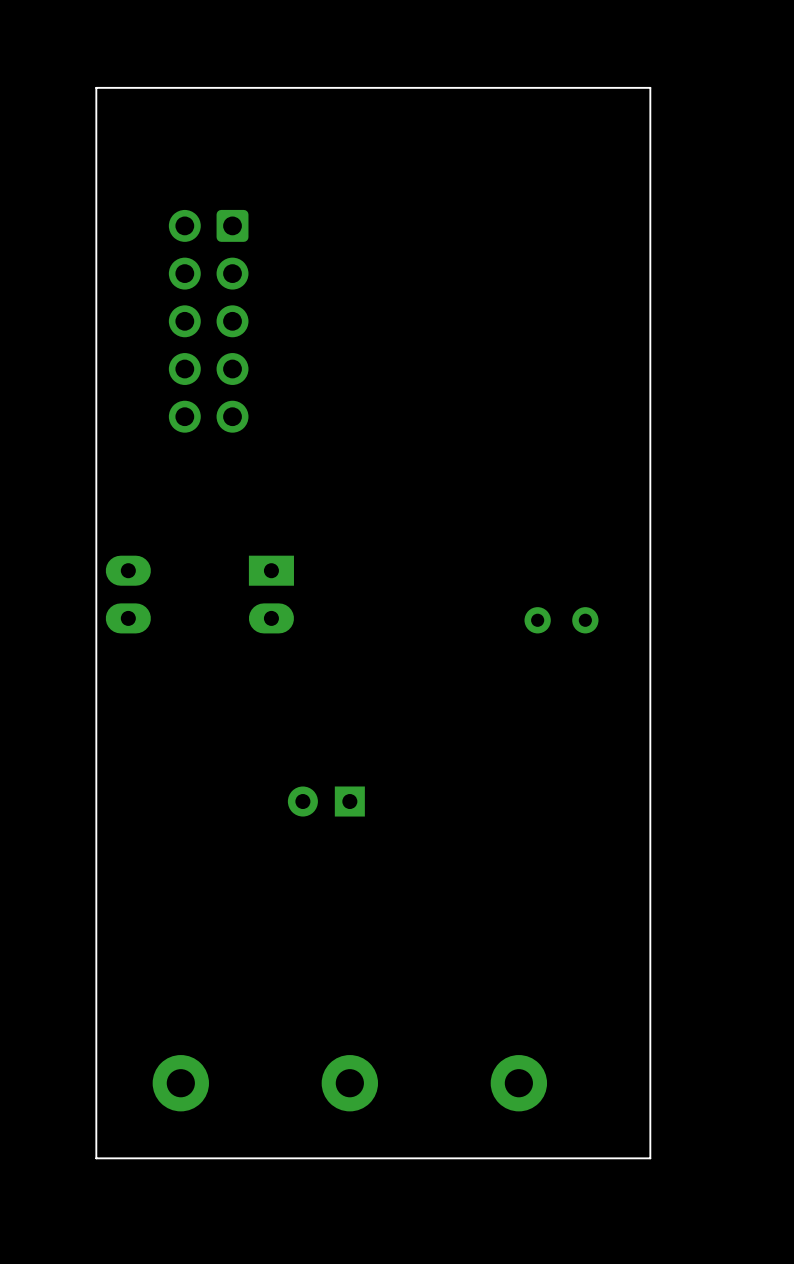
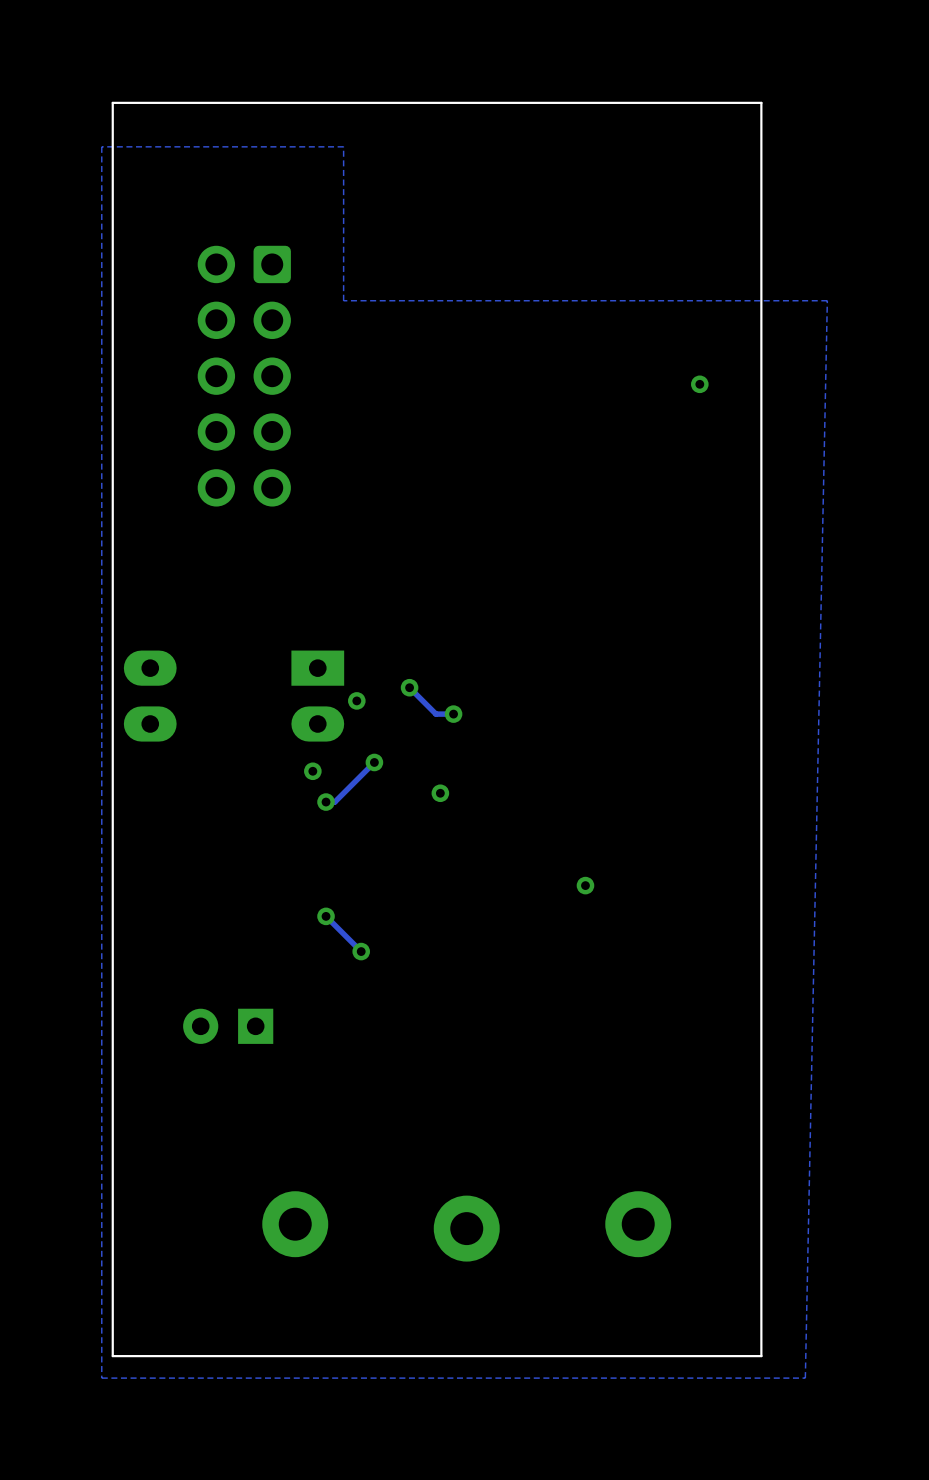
zone outline: none -> (343, 146) (343, 300) (827, 300) (805, 1378) (101, 1378) (101, 146) (343, 146)
via: none -> (699, 384)
track: none -> (409, 687) (435, 714) (453, 714)
via: none -> (409, 687)
via: none -> (356, 700)
via: none -> (453, 714)
part: (561, 620) -> none
track: none -> (374, 762) (334, 802) (326, 802)
via: none -> (374, 762)
via: none -> (312, 771)
via: none -> (440, 793)
via: none -> (326, 802)
via: none -> (585, 885)
track: none -> (326, 916) (361, 951)
via: none -> (326, 916)
part position: (326, 801) -> (228, 1026)
via: none -> (361, 951)
part: none -> (295, 1224)
part: none -> (466, 1228)
part: (180, 1083) -> none
part: (349, 1083) -> none
part position: (518, 1083) -> (638, 1224)

